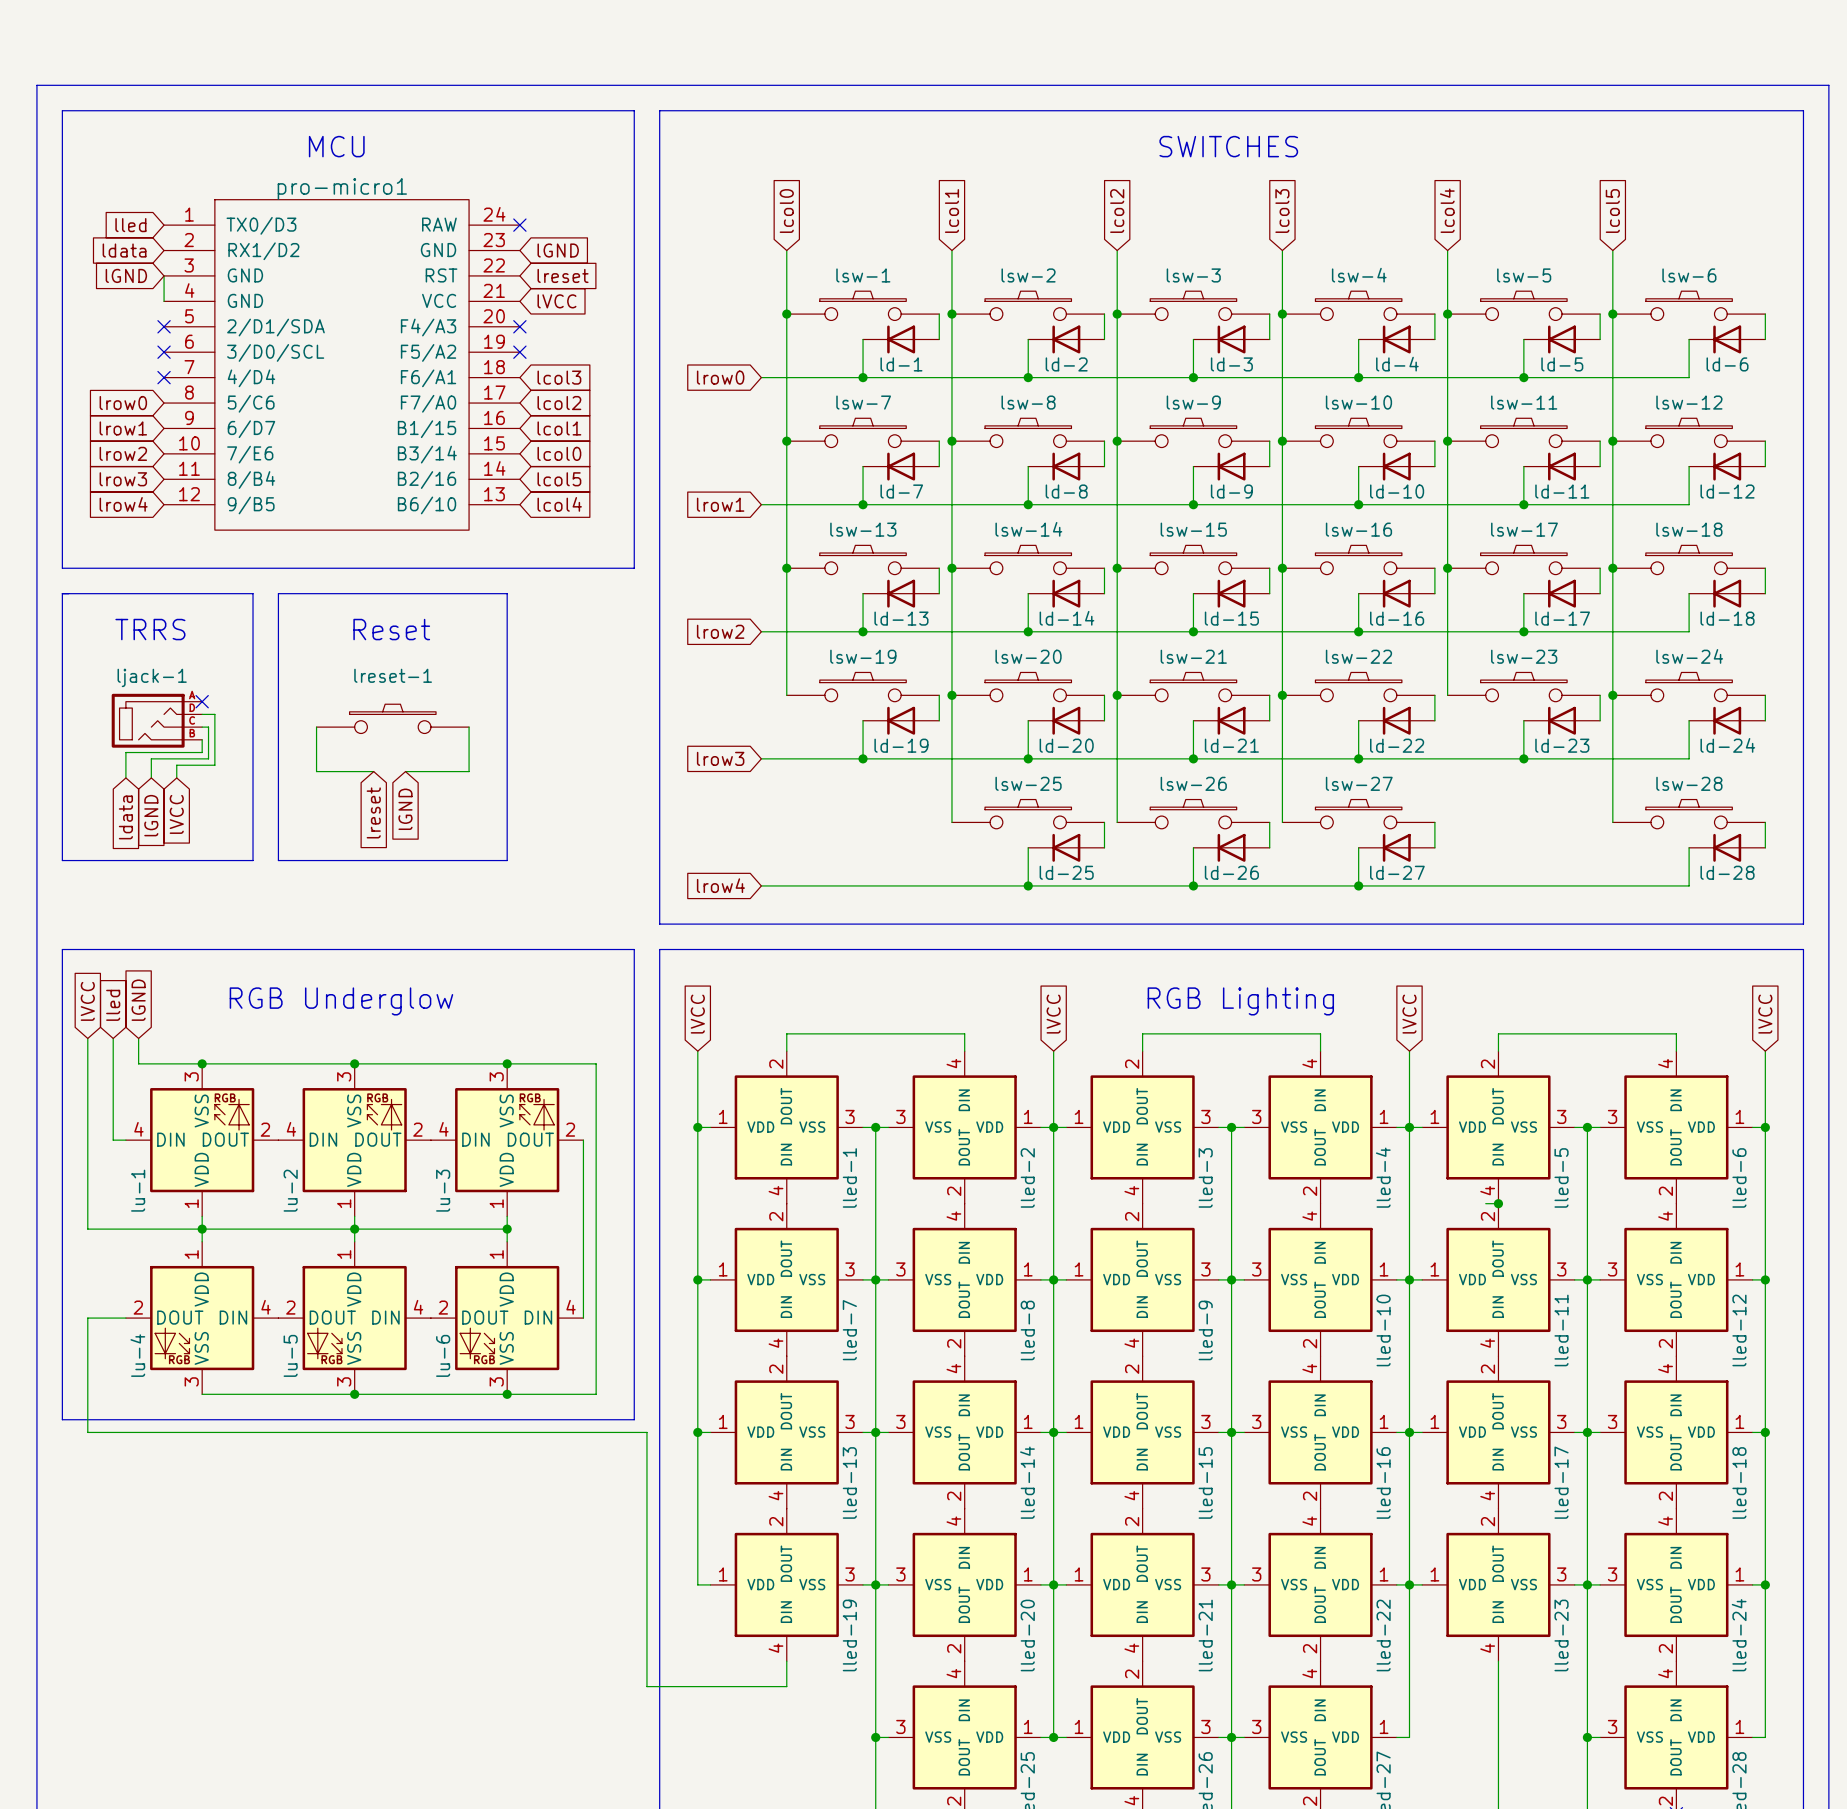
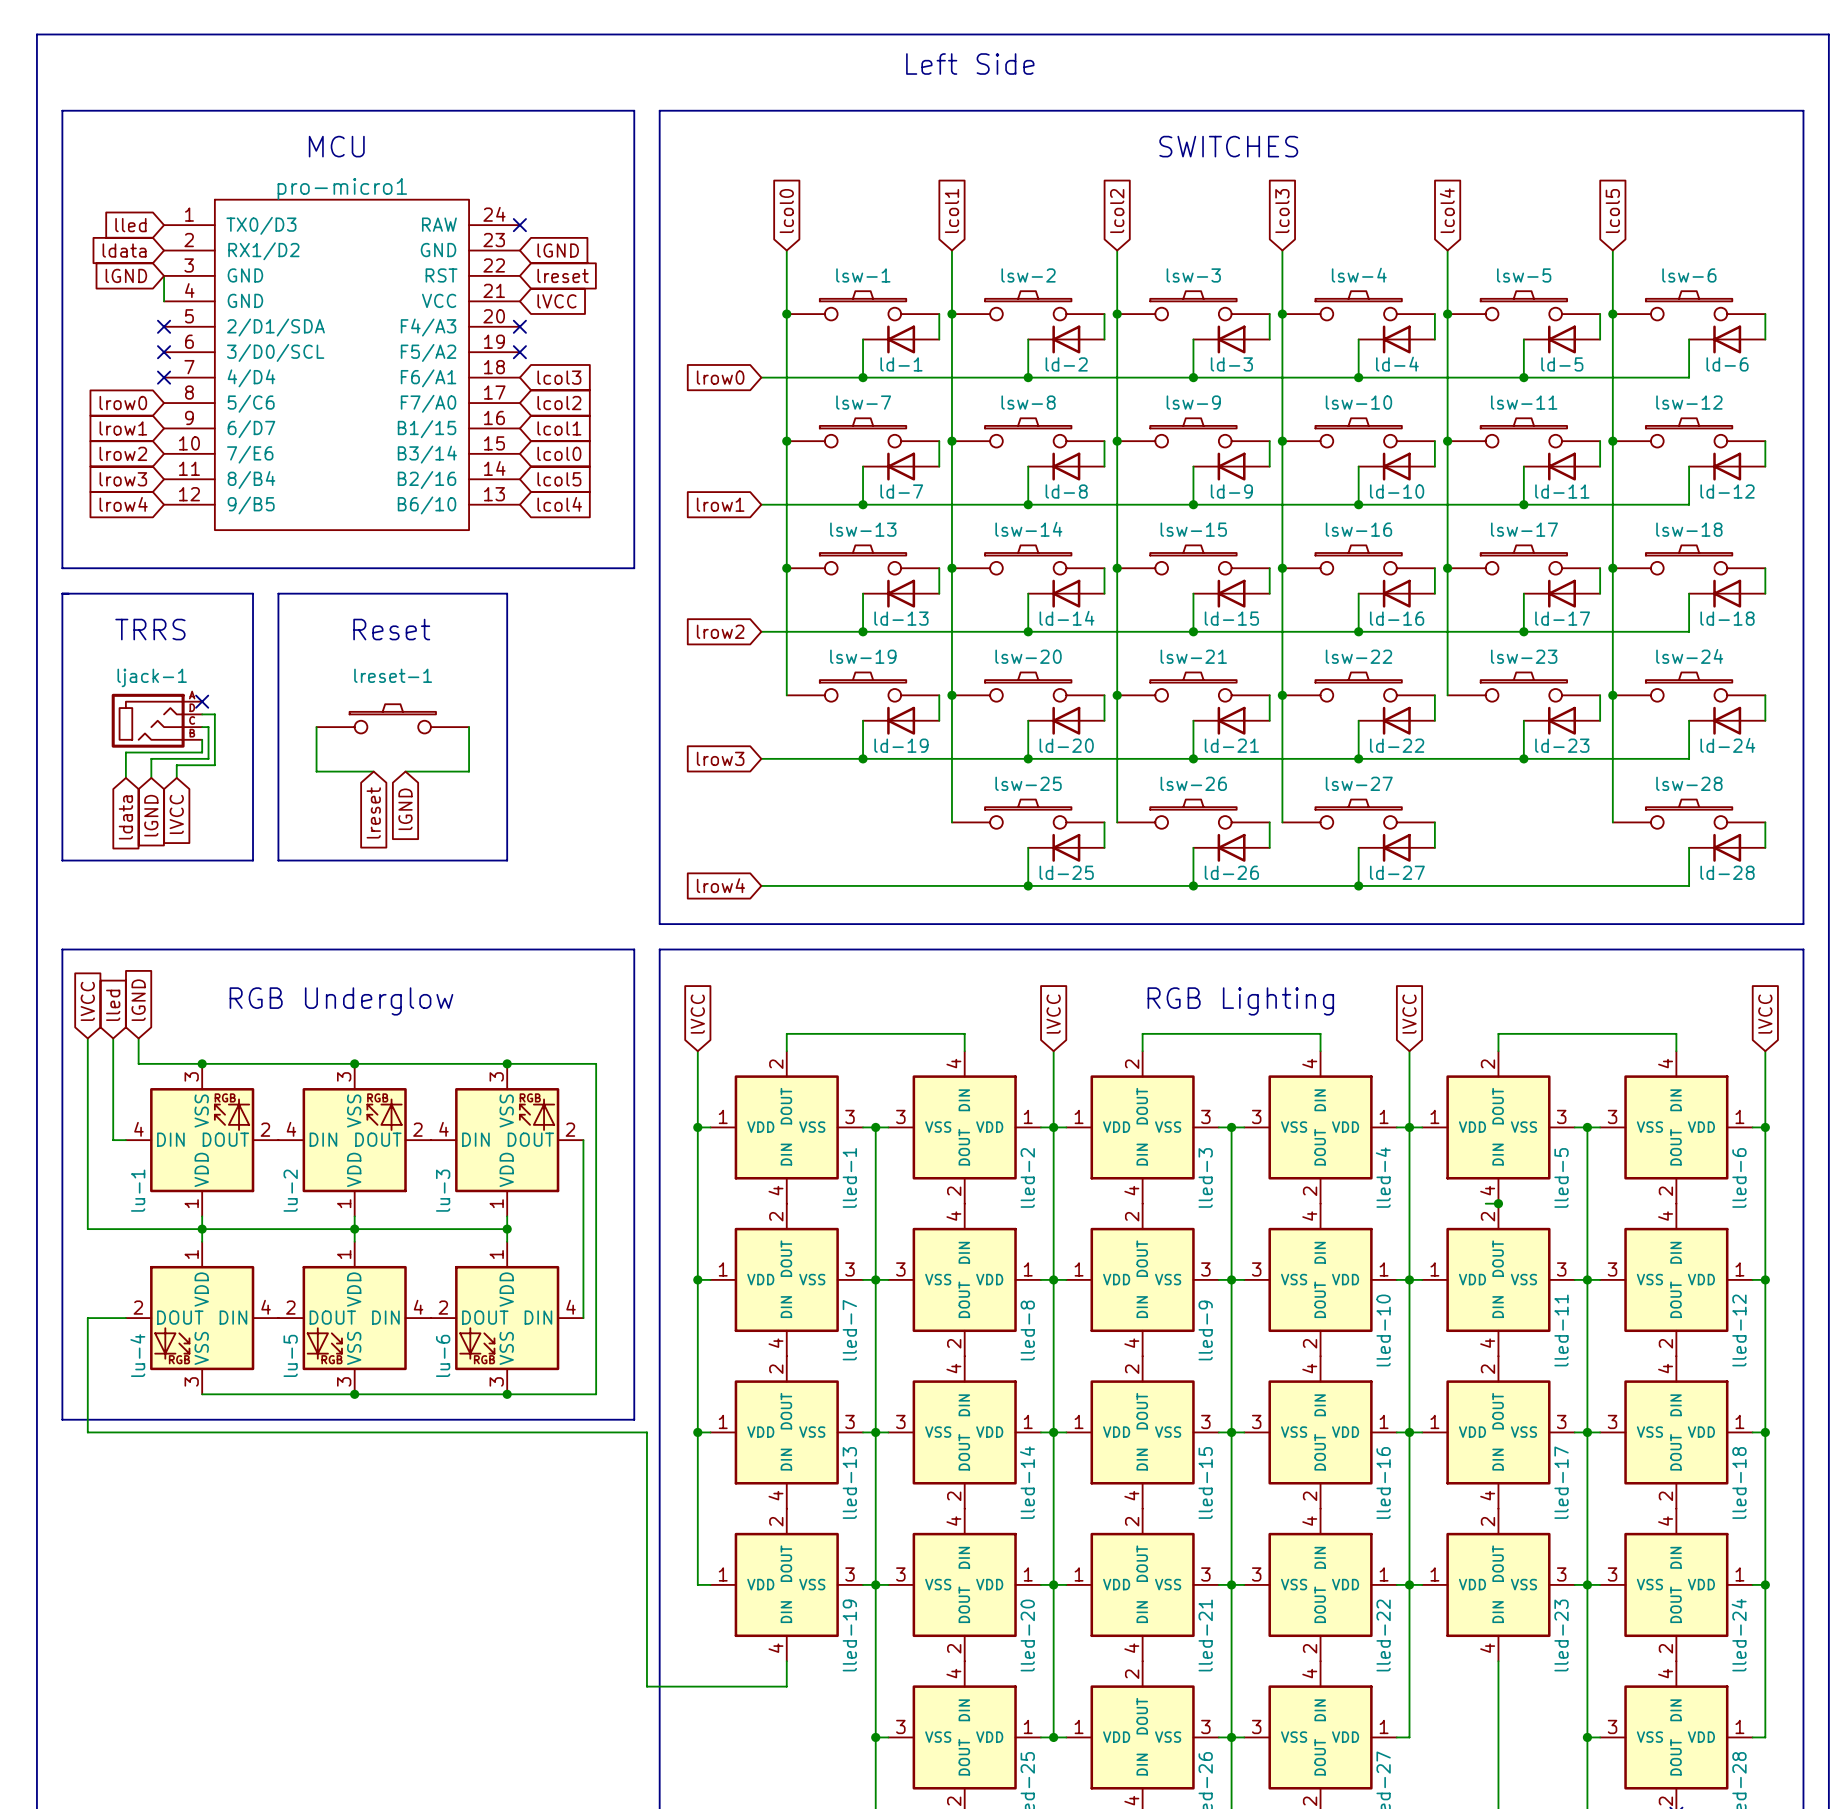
text: none -> Left Side (970, 64)
line: (36, 85) (1828, 85) -> (36, 85) (36, 34) (1828, 34) (1828, 85)

